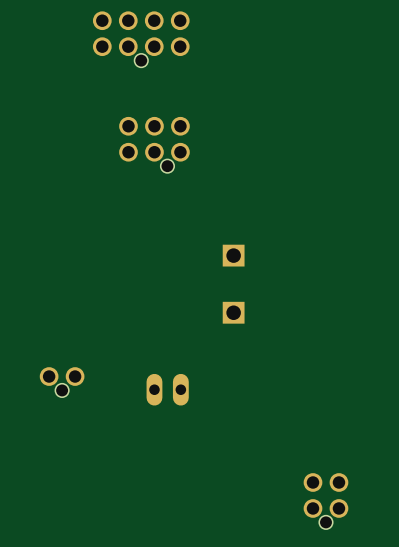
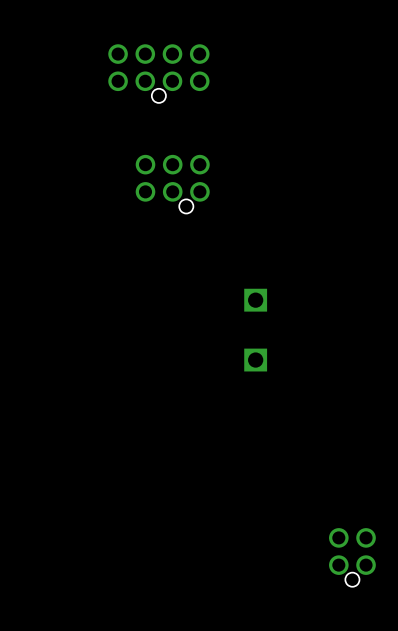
part: (62, 382) -> none
part: (167, 389) -> none

